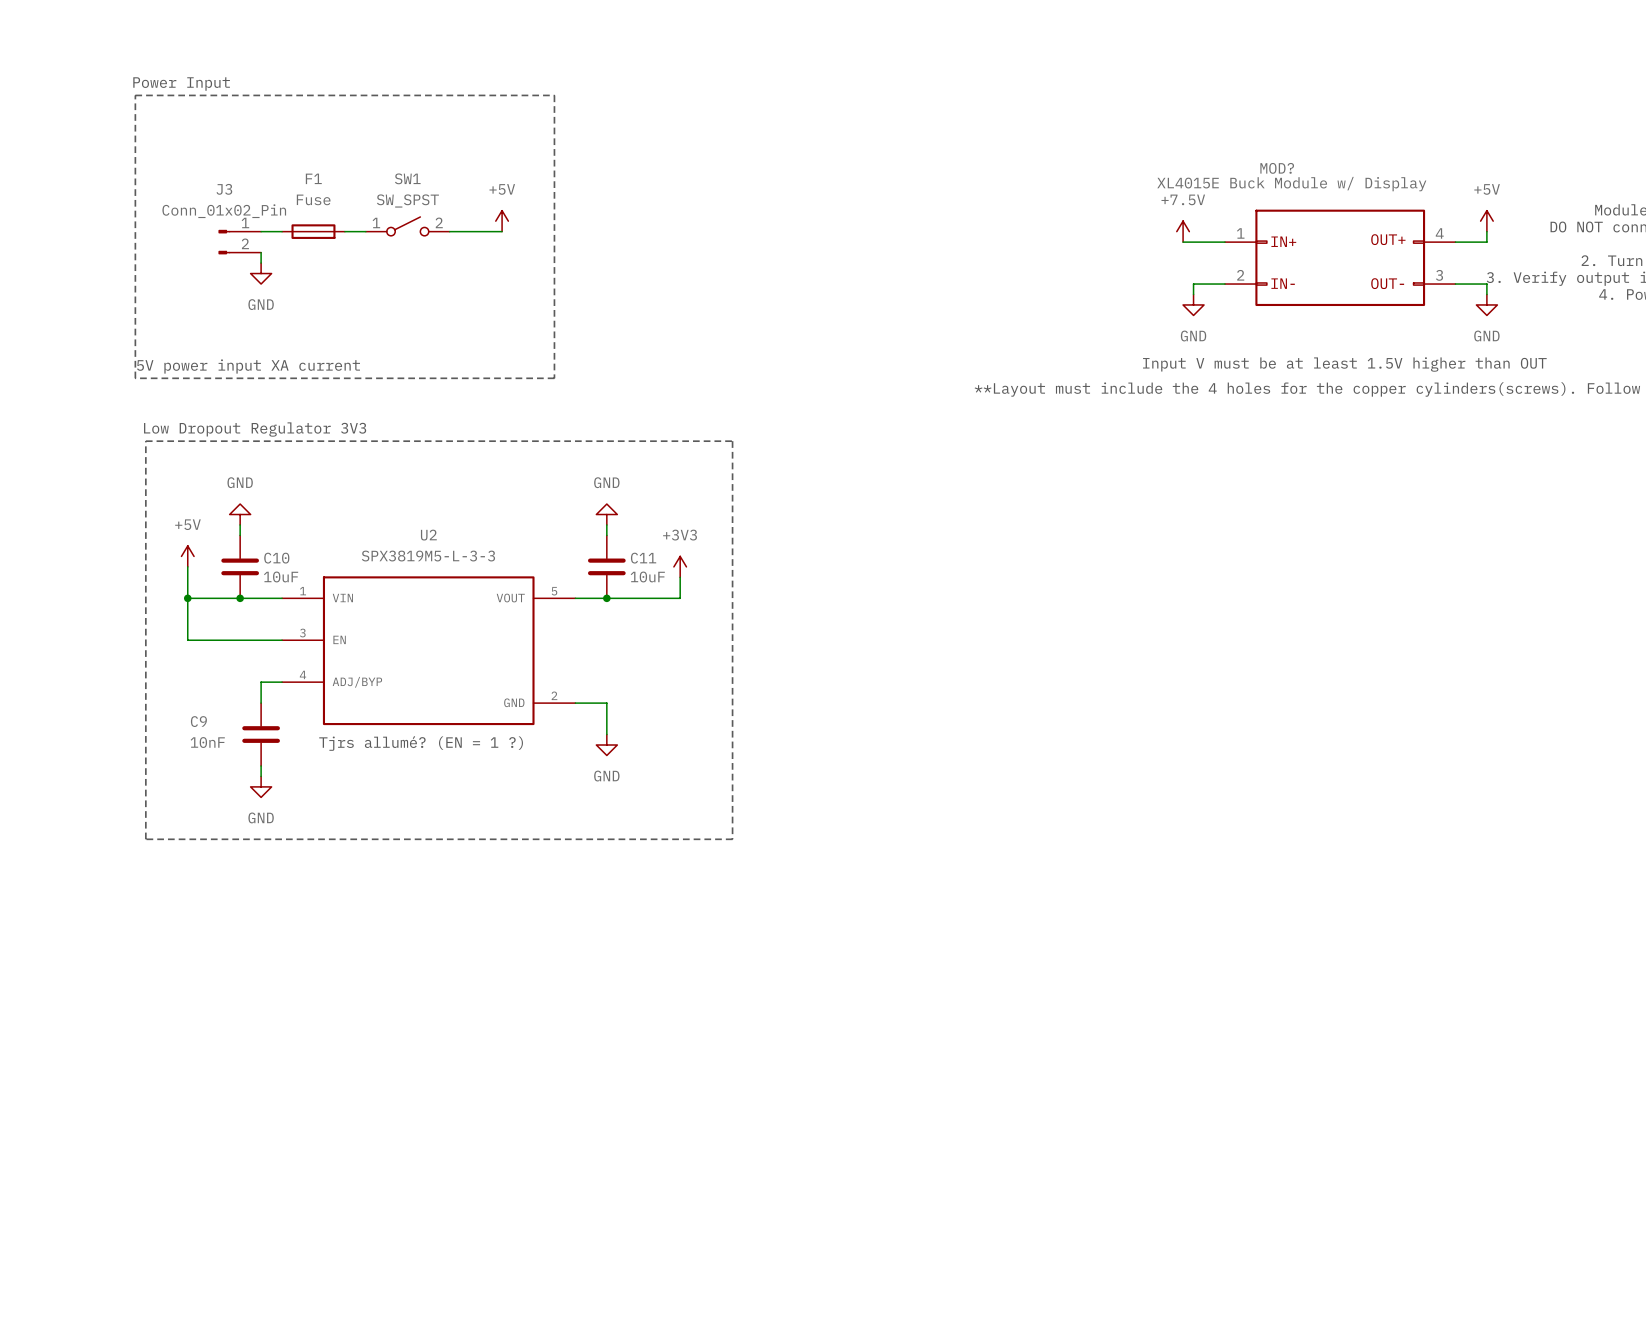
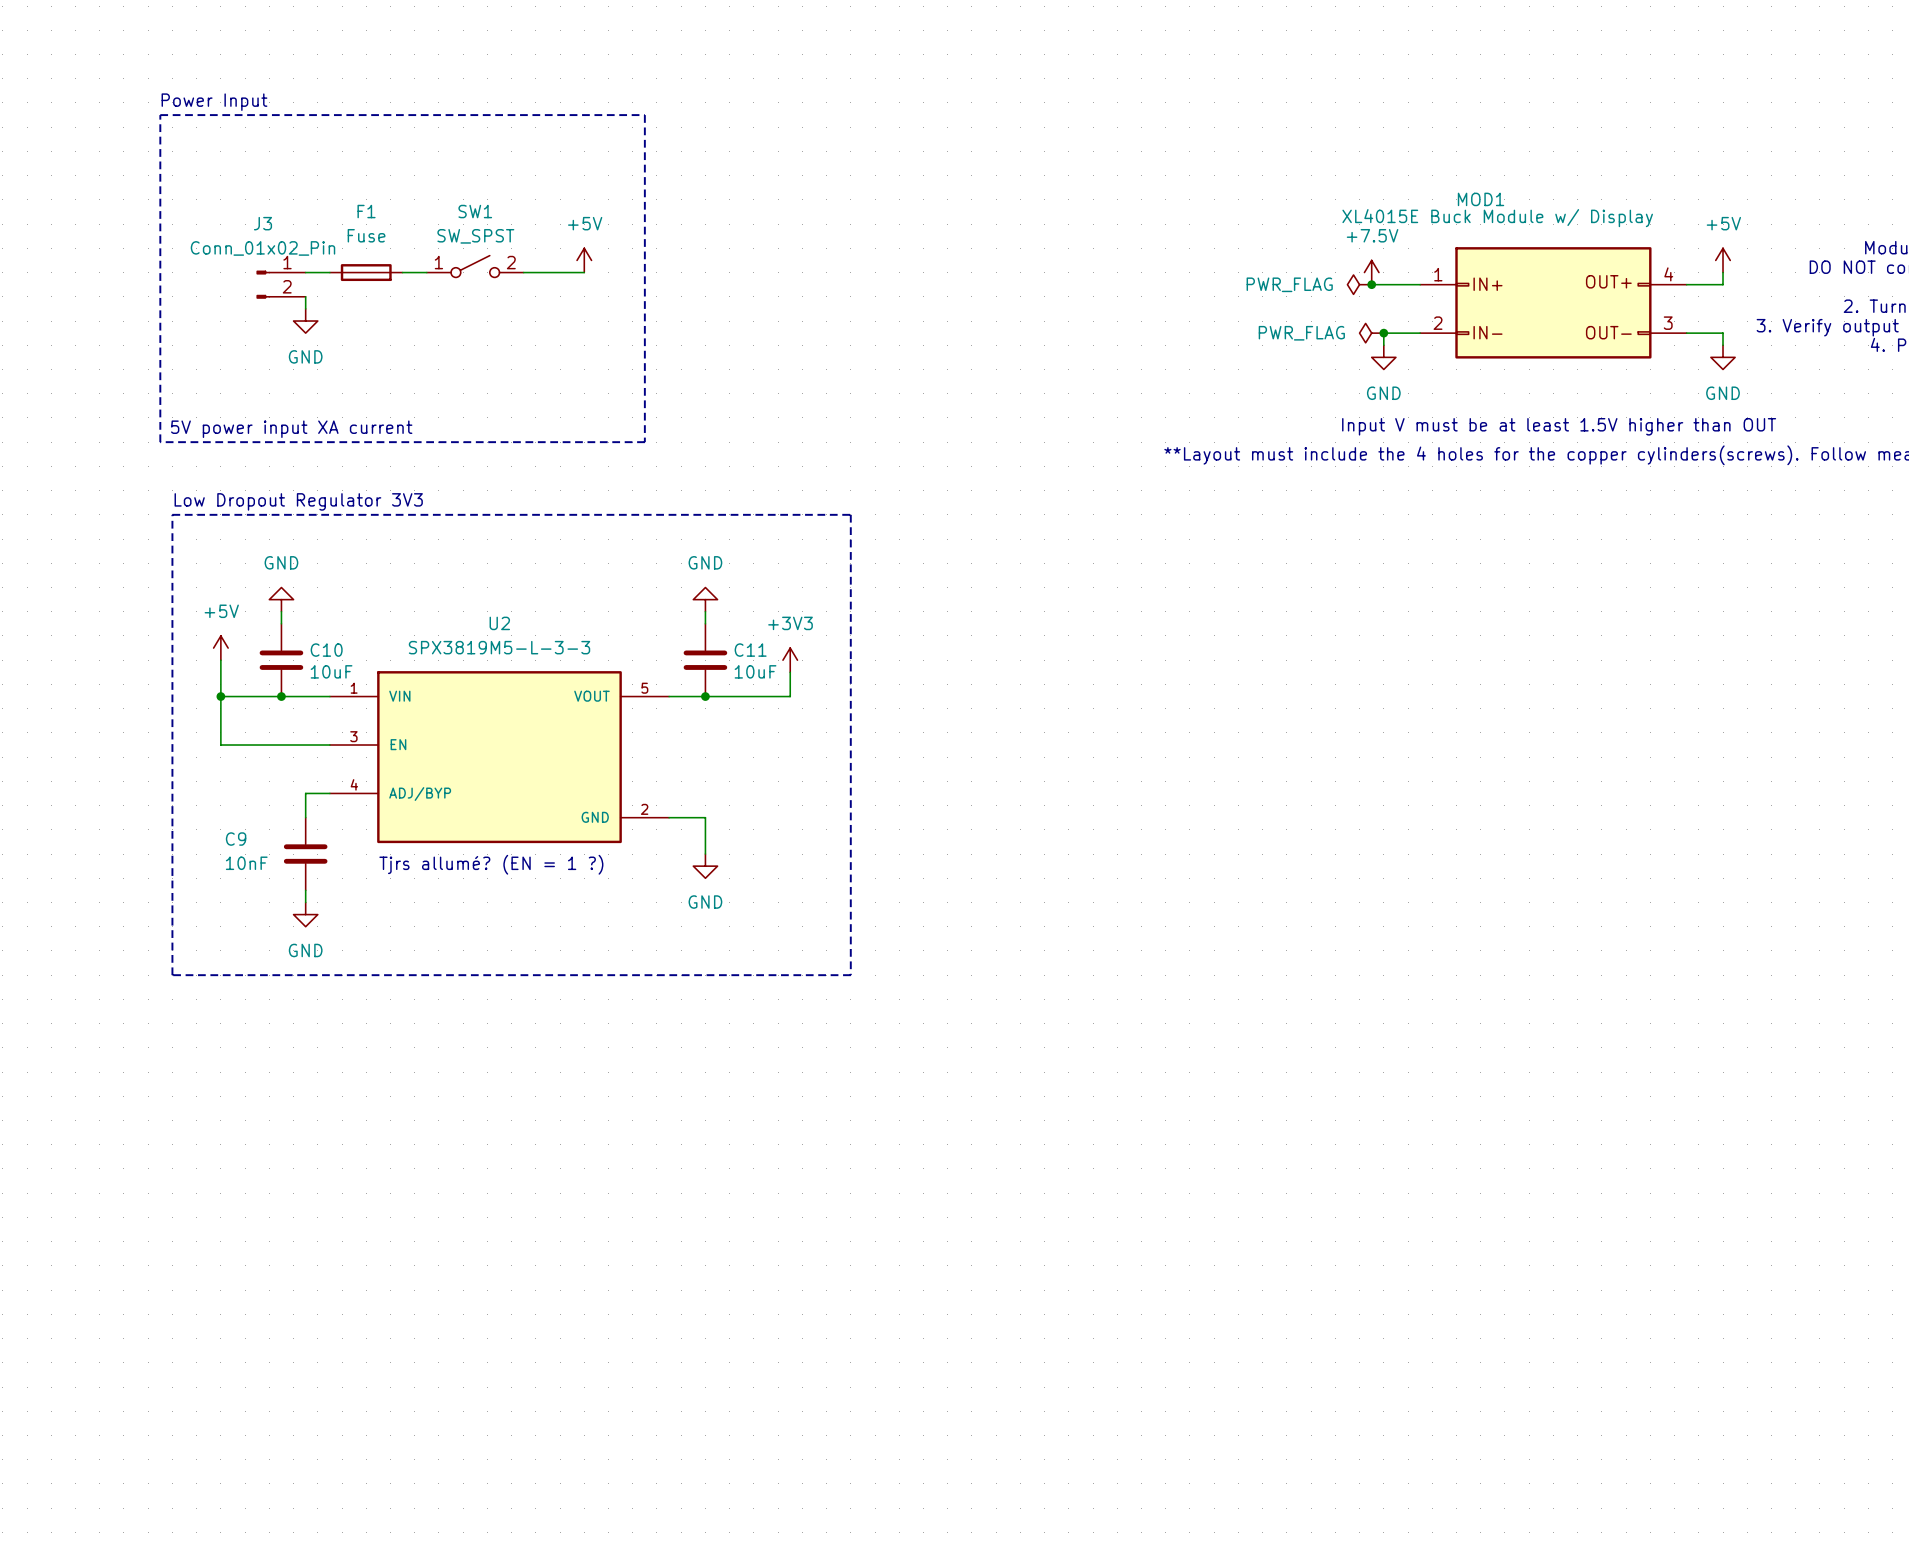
MOD? name: MOD? (1277, 168) -> MOD1 (1481, 199)
power symbol: none -> PWR_FLAG (1359, 284)
junction: none -> (1371, 284)
power symbol: none -> PWR_FLAG (1371, 333)
junction: none -> (1383, 333)

